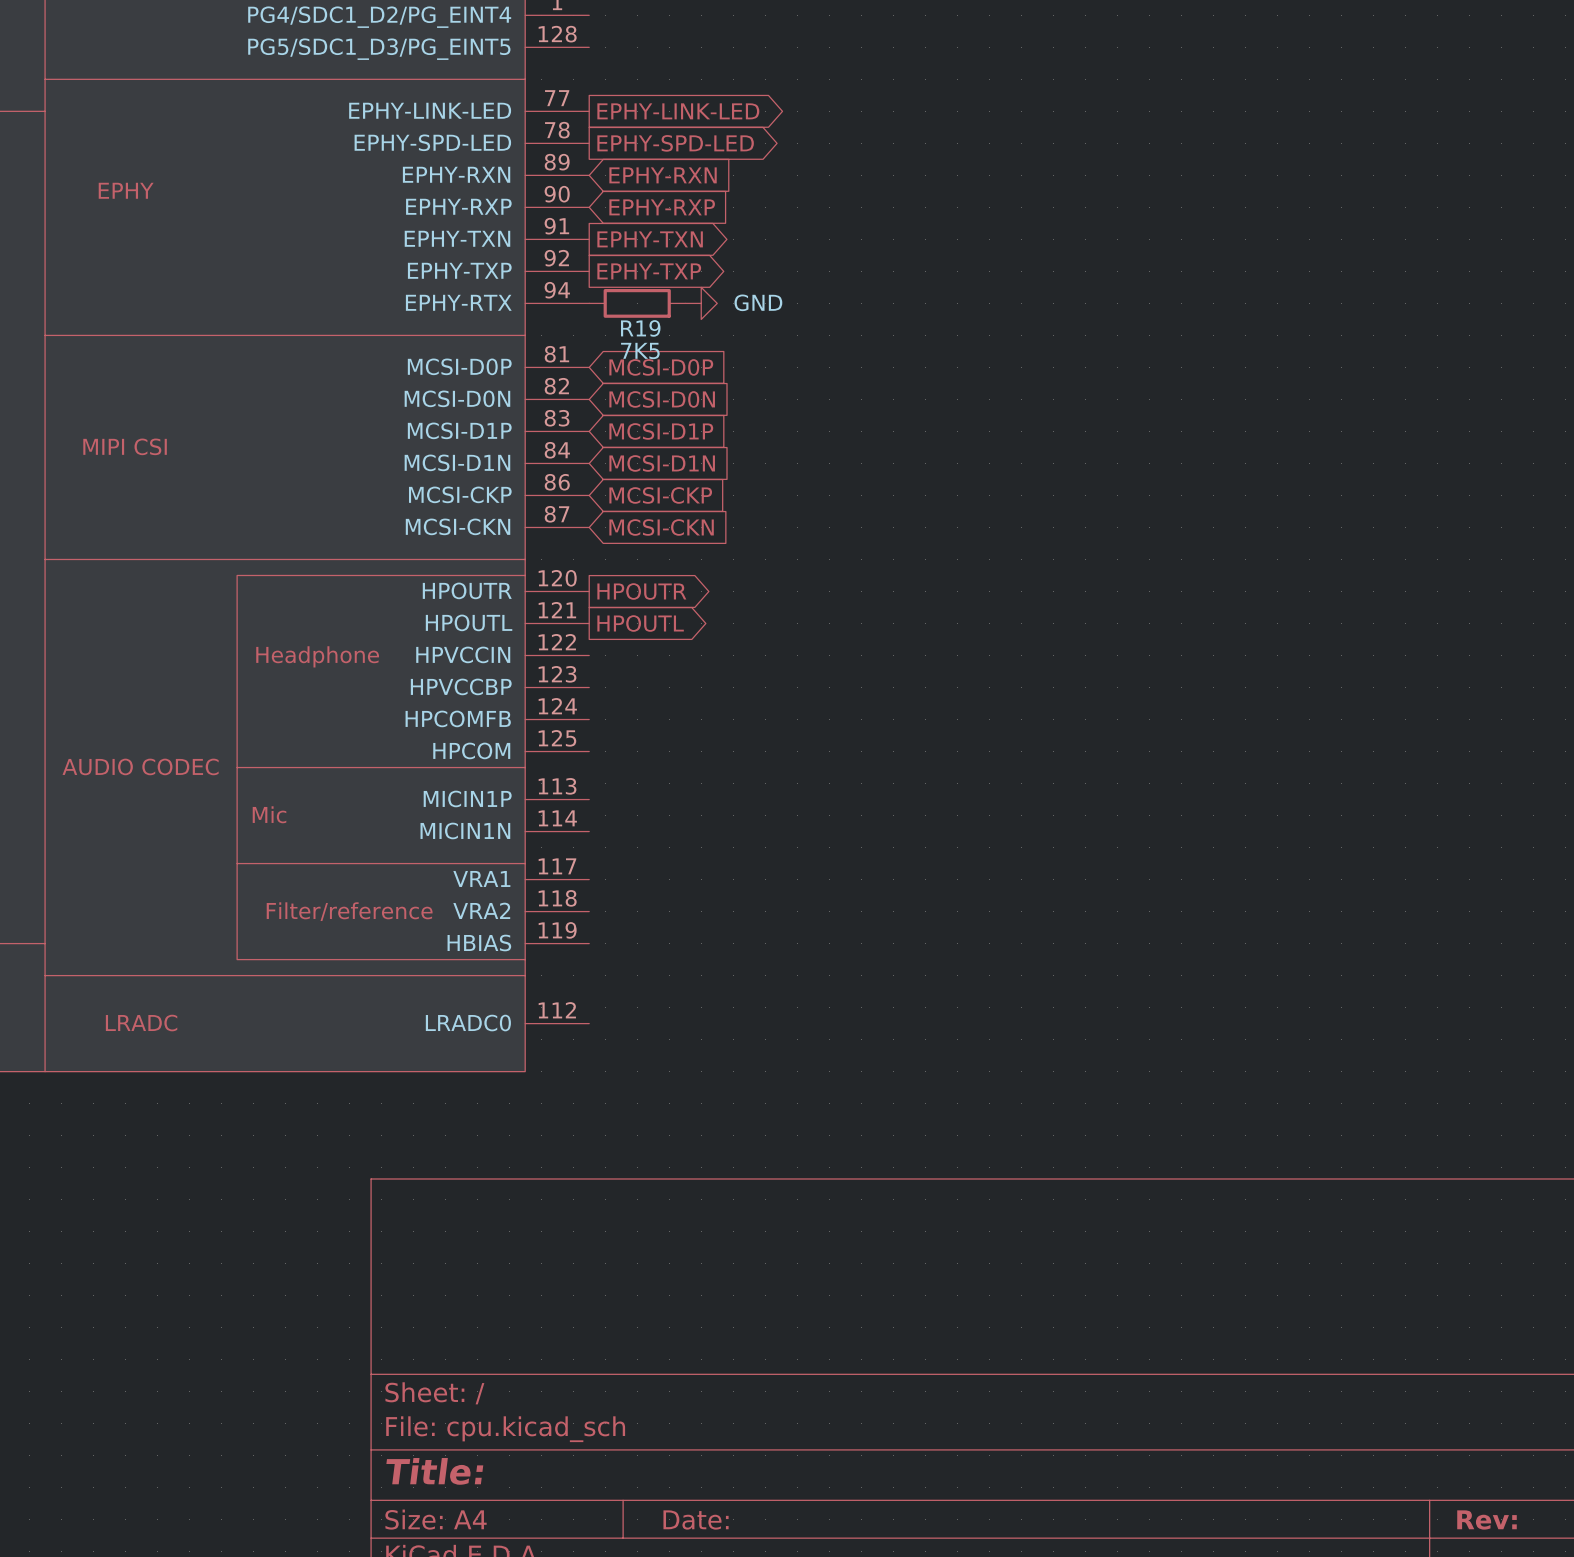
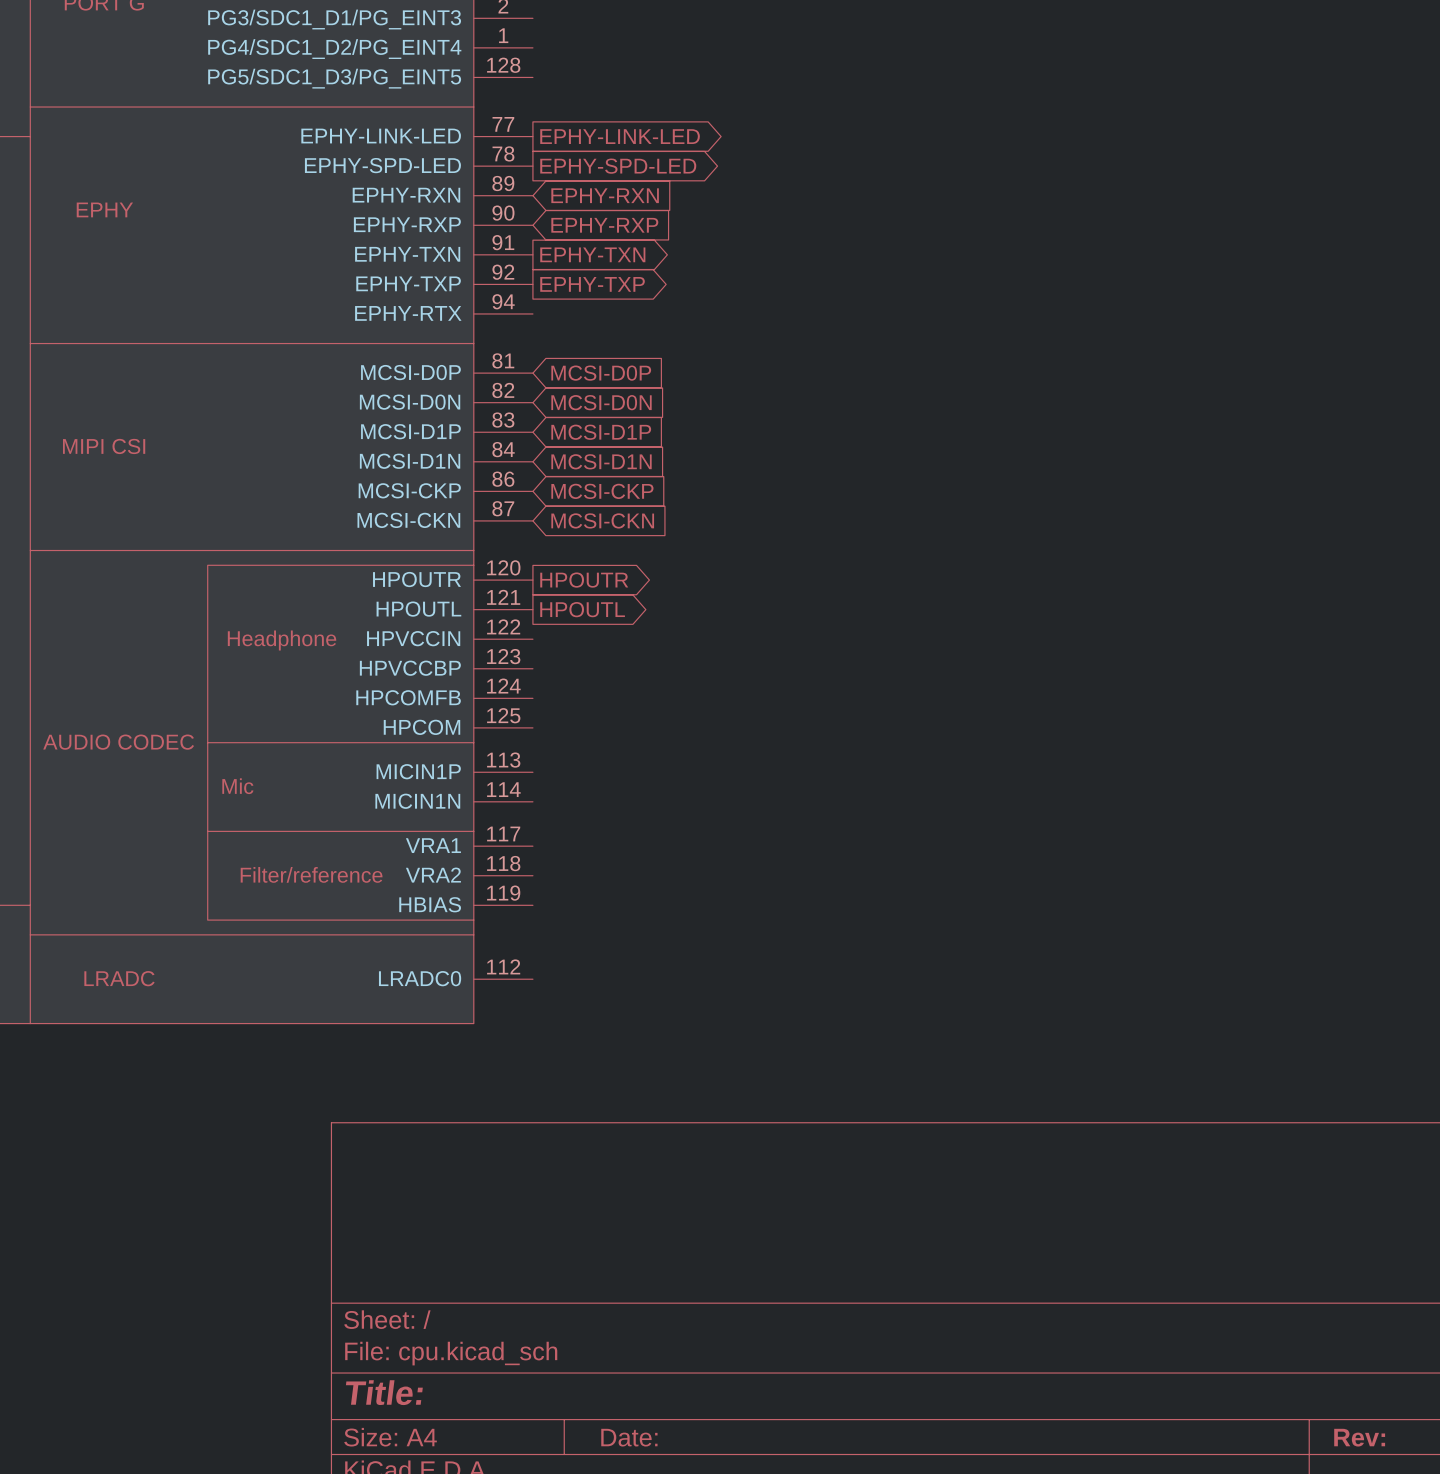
R19: 7K5 (637, 303) -> none
power symbol: GND (701, 303) -> none

